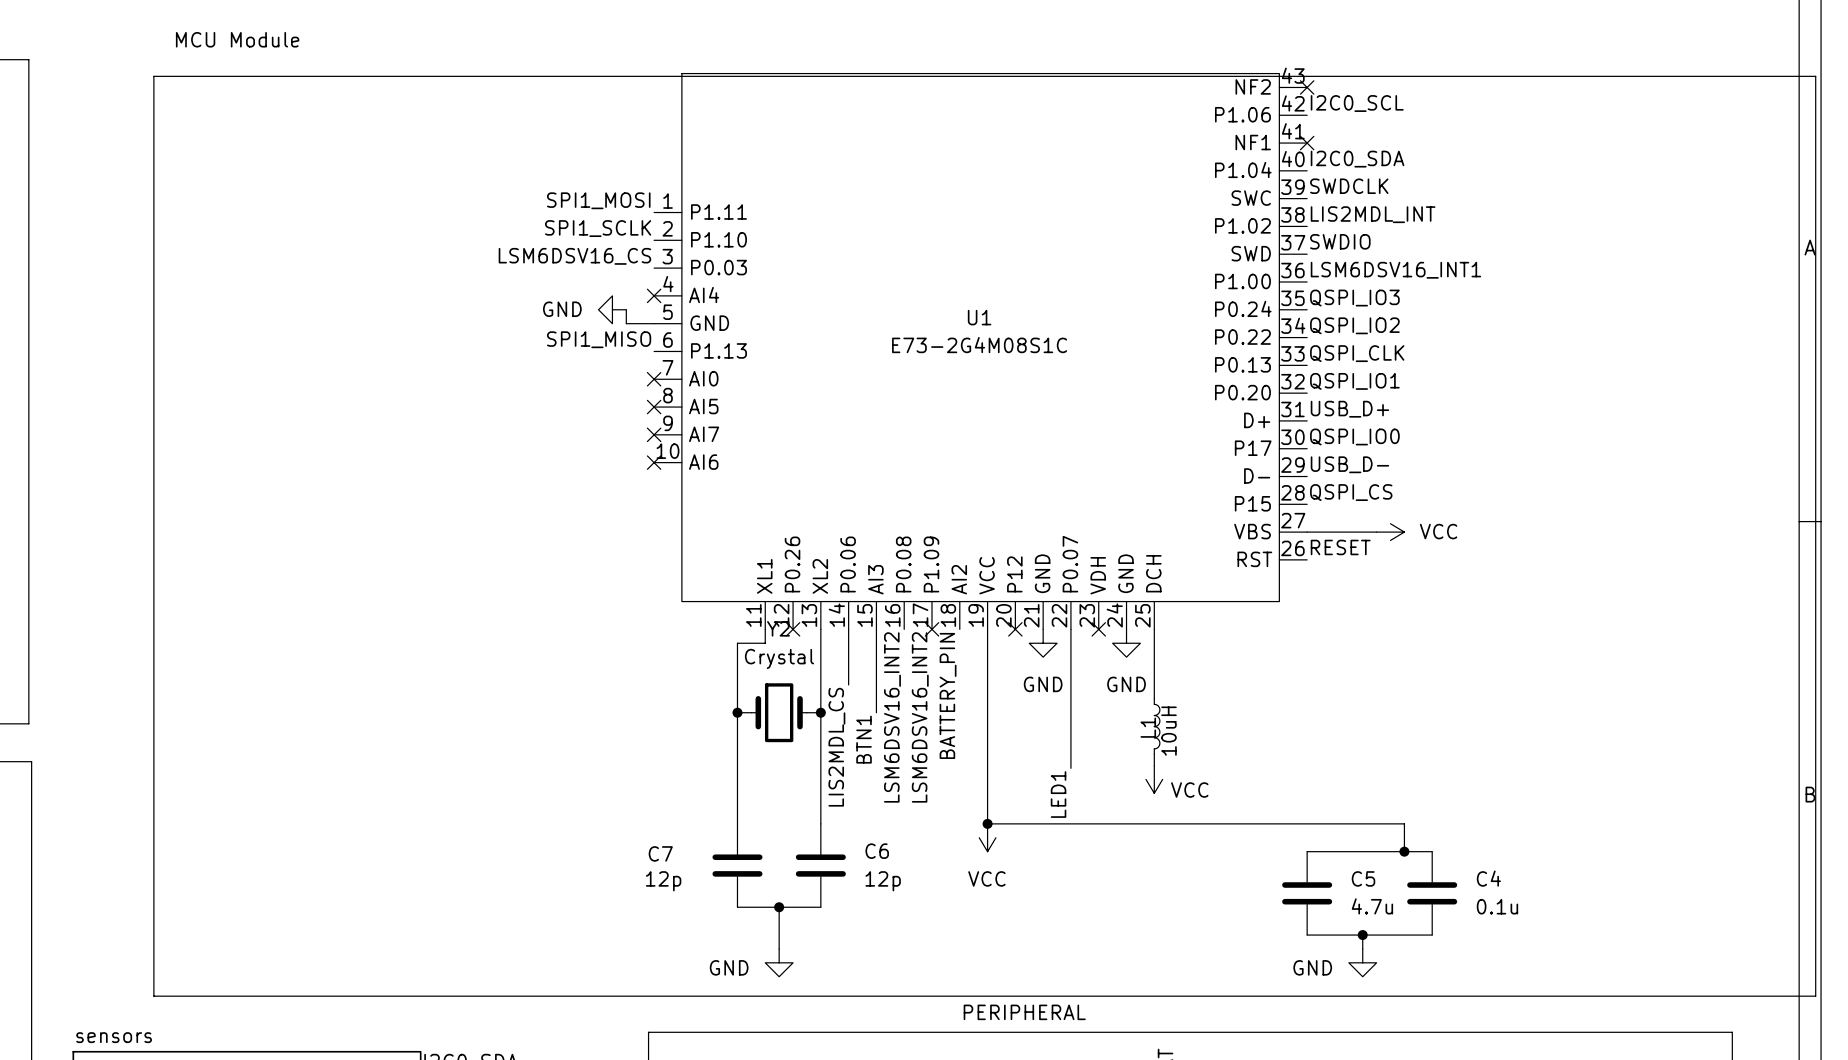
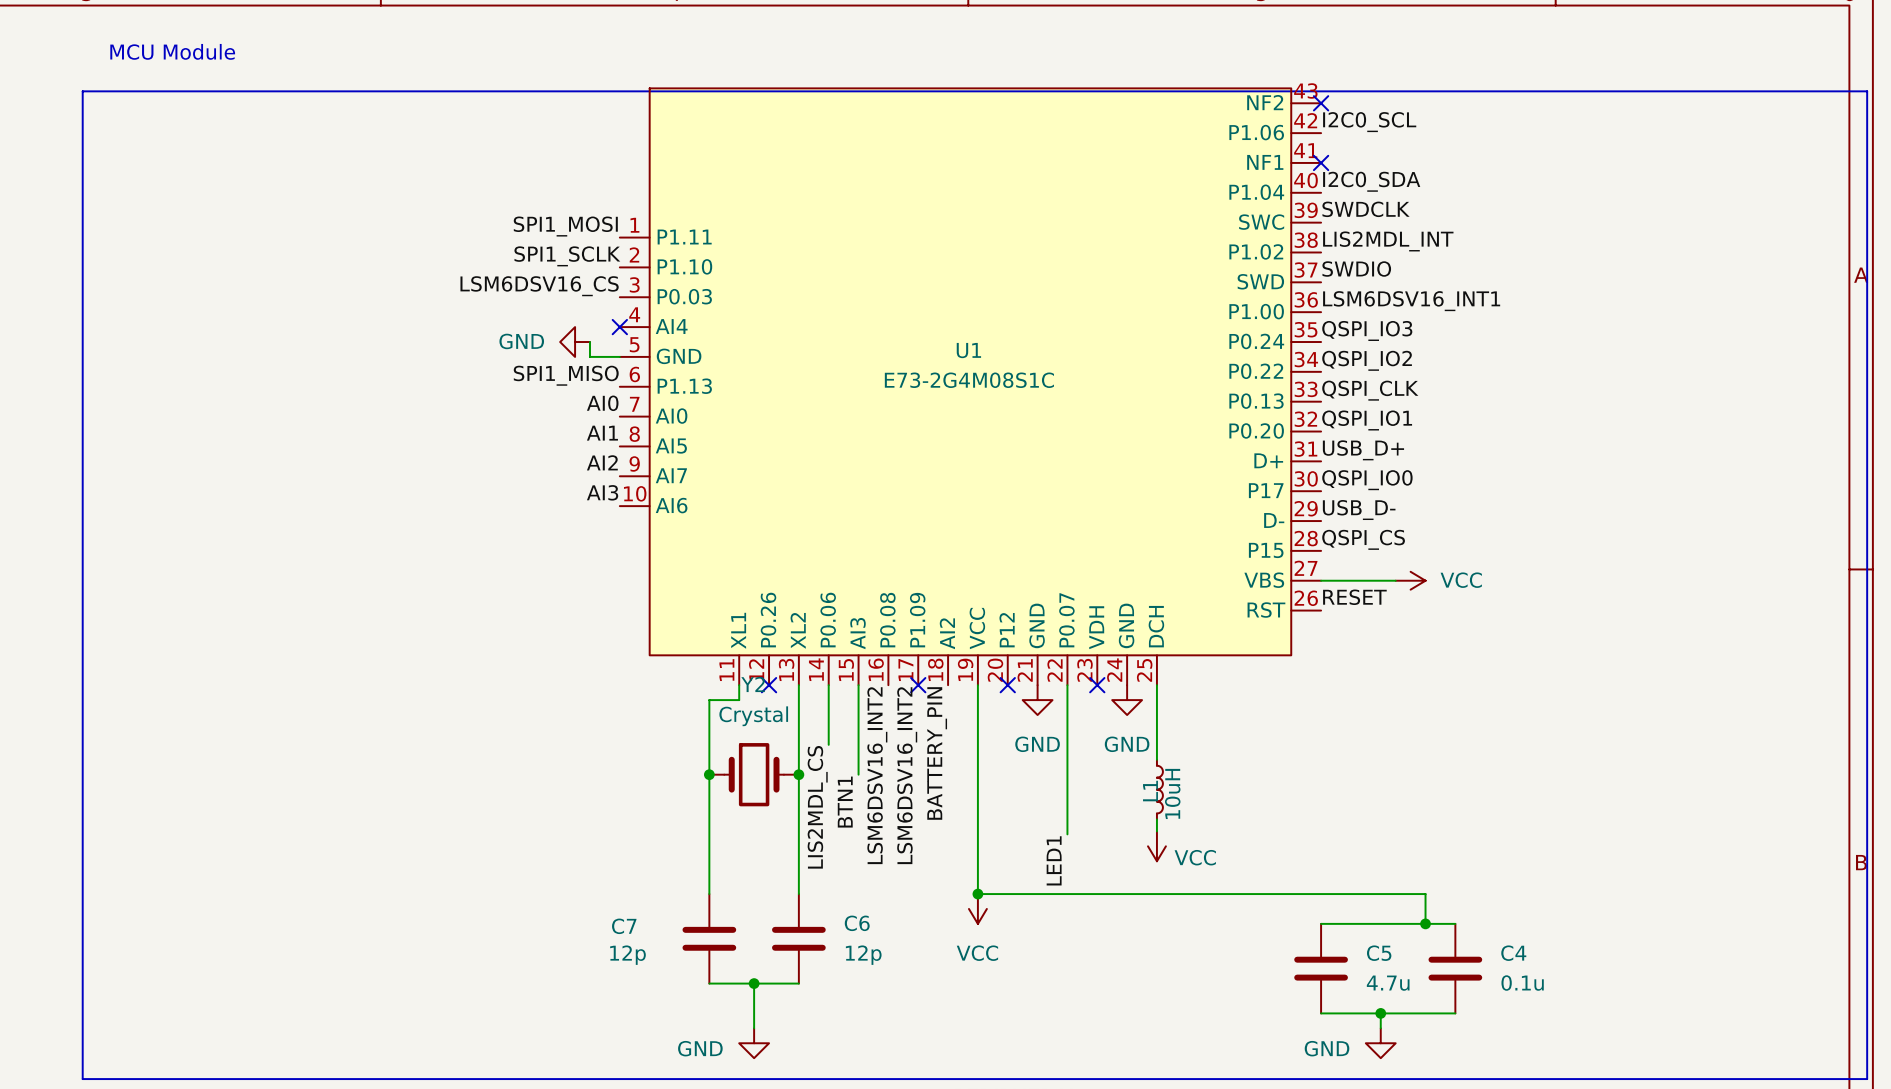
label: none -> AI0 (602, 403)
no-connect mark: (654, 379) -> none
label: none -> AI1 (602, 433)
no-connect mark: (654, 407) -> none
label: none -> AI2 (602, 462)
no-connect mark: (654, 434) -> none
label: none -> AI3 (602, 492)
no-connect mark: (654, 462) -> none

